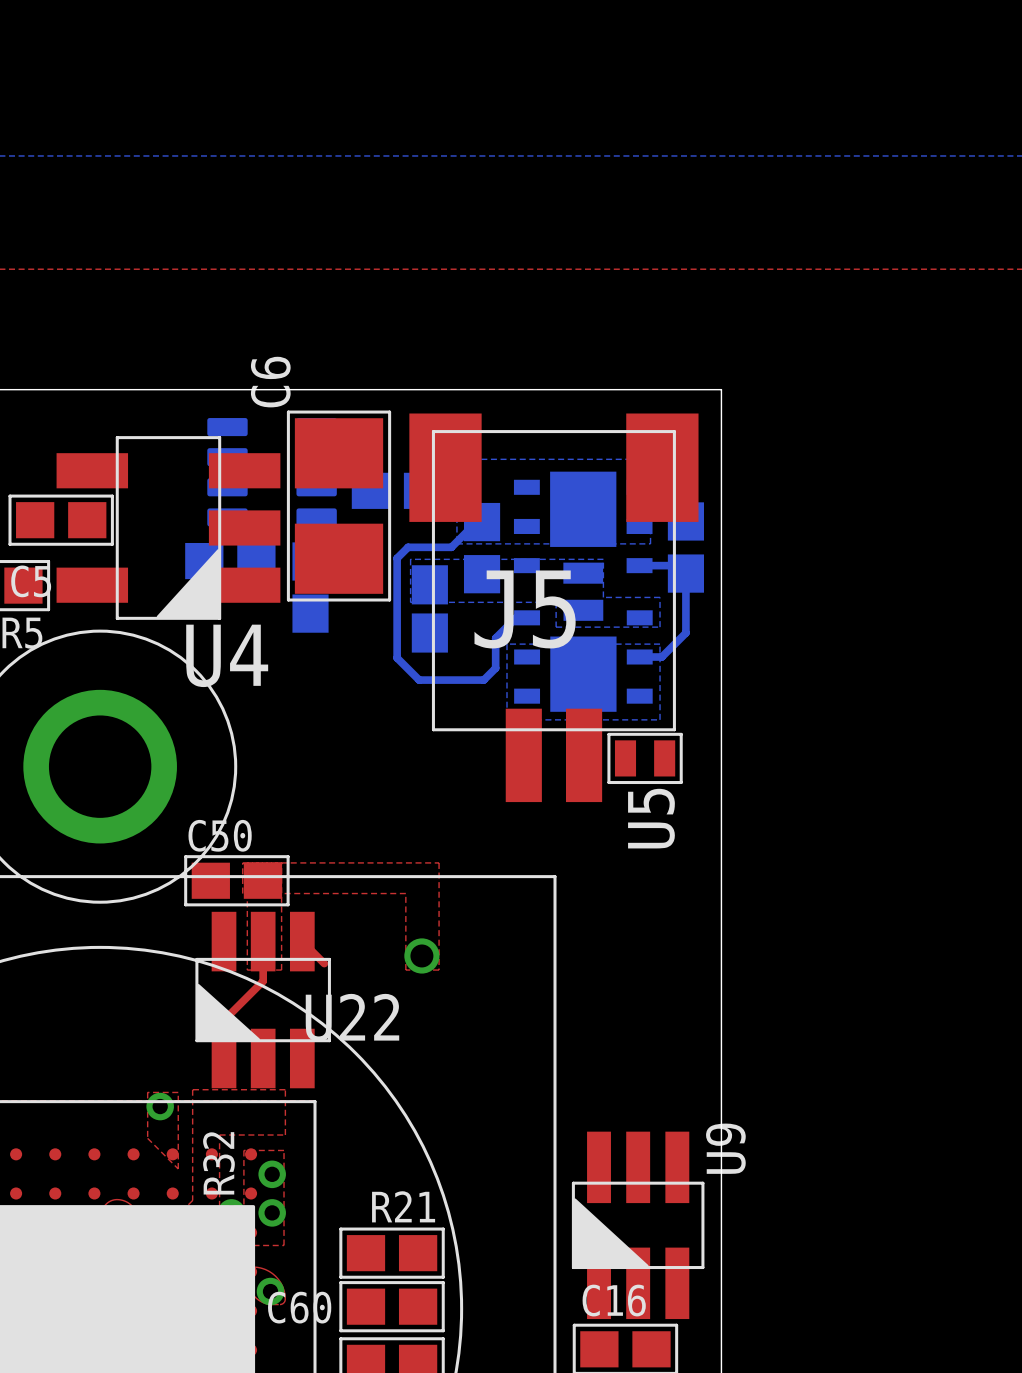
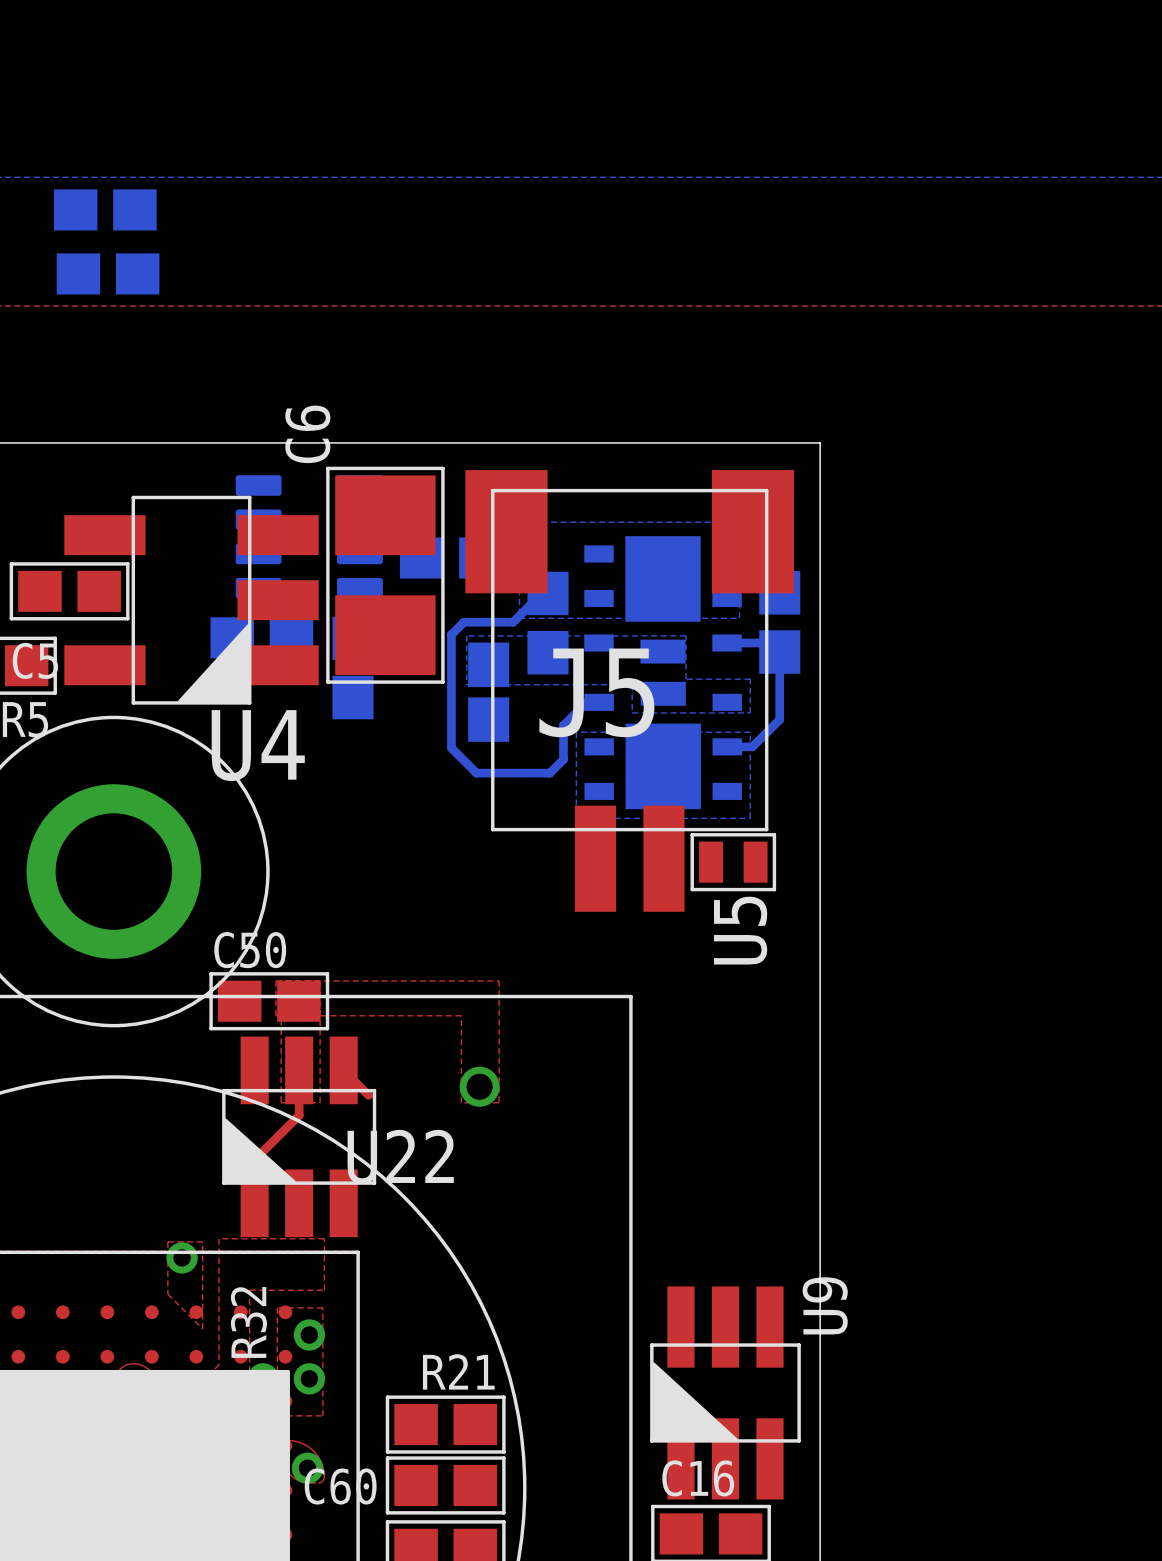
part: none -> (105, 209)
part: none -> (108, 273)

